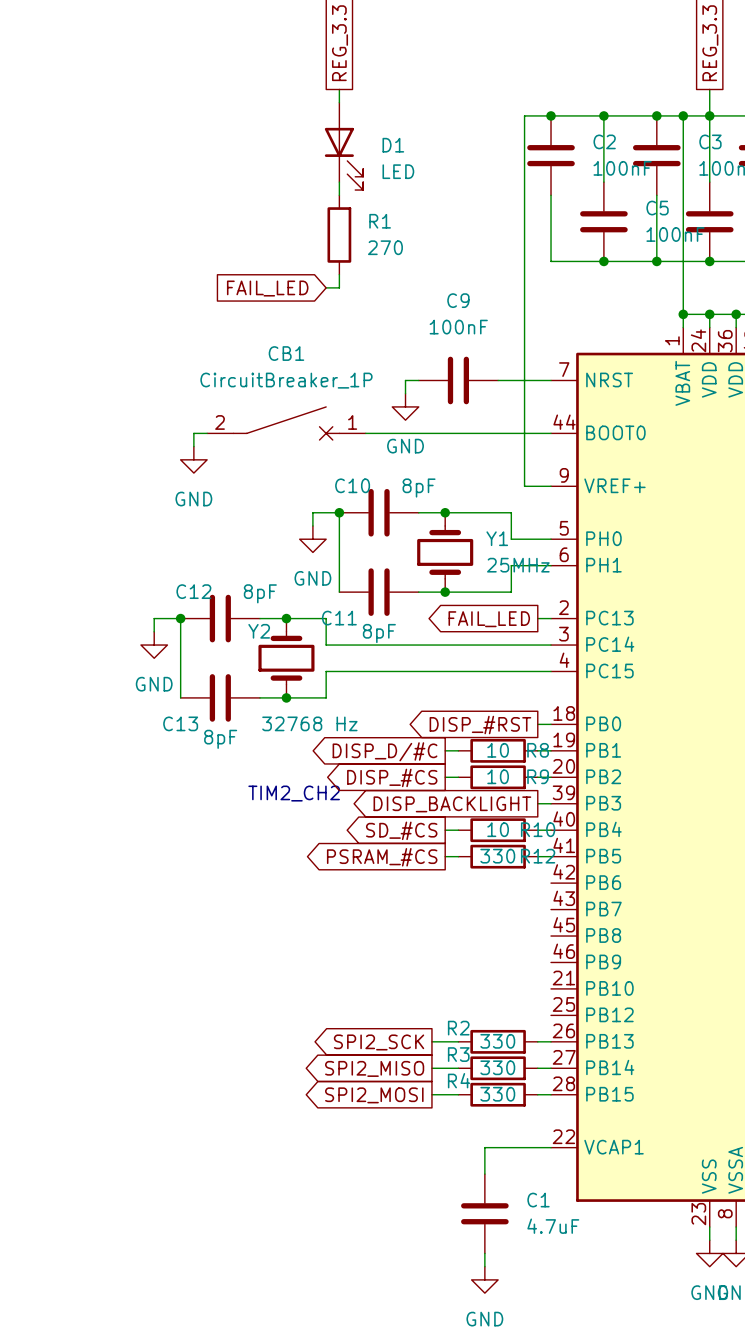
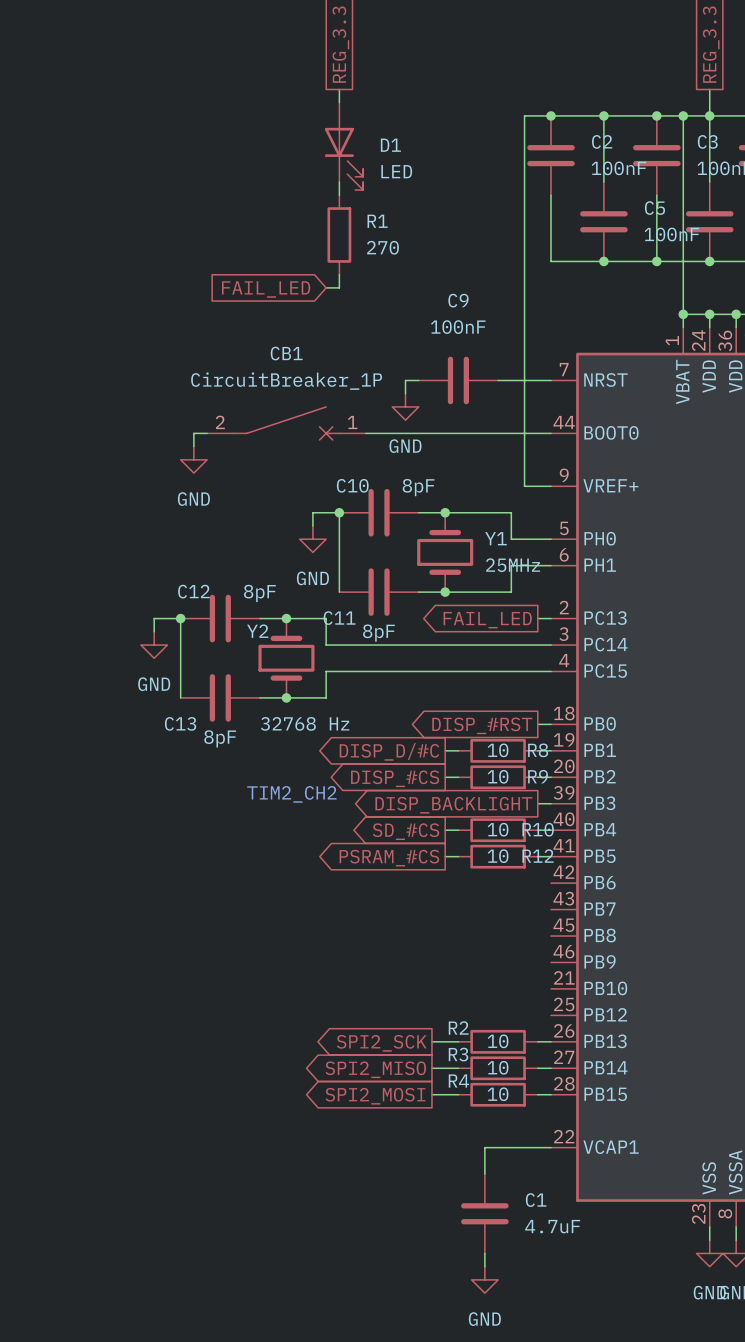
R12 value: 330 (497, 856) -> 10 (498, 856)
R2 value: 330 (497, 1041) -> 10 (498, 1041)
R3 value: 330 (497, 1067) -> 10 (498, 1067)
R4 value: 330 (497, 1094) -> 10 (498, 1094)

